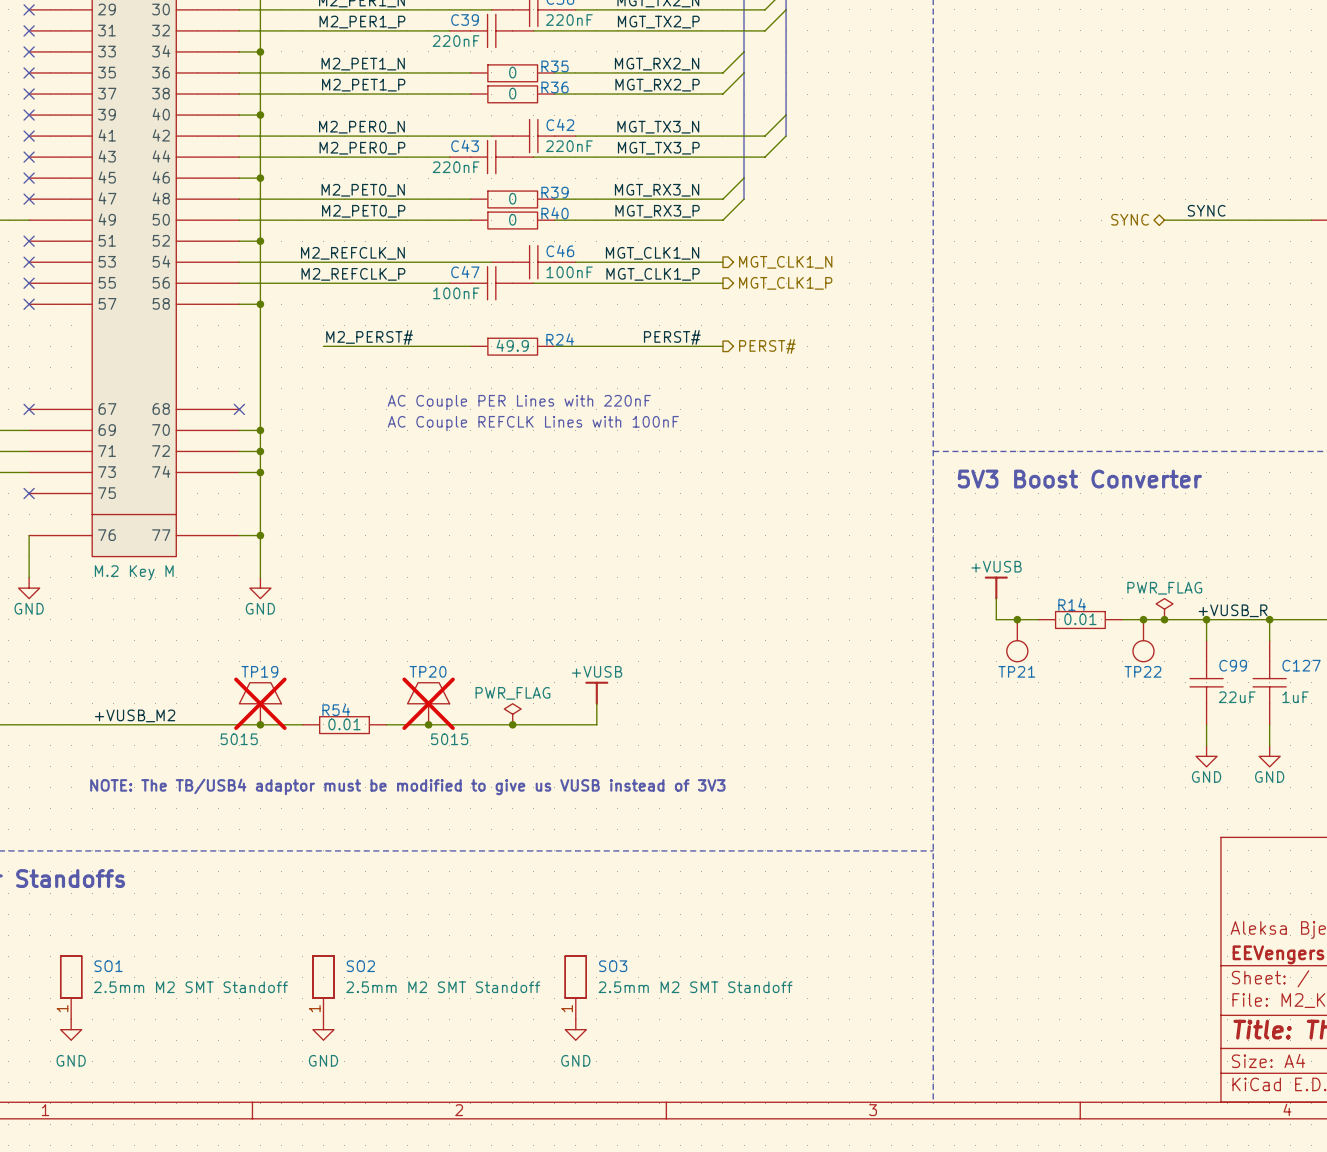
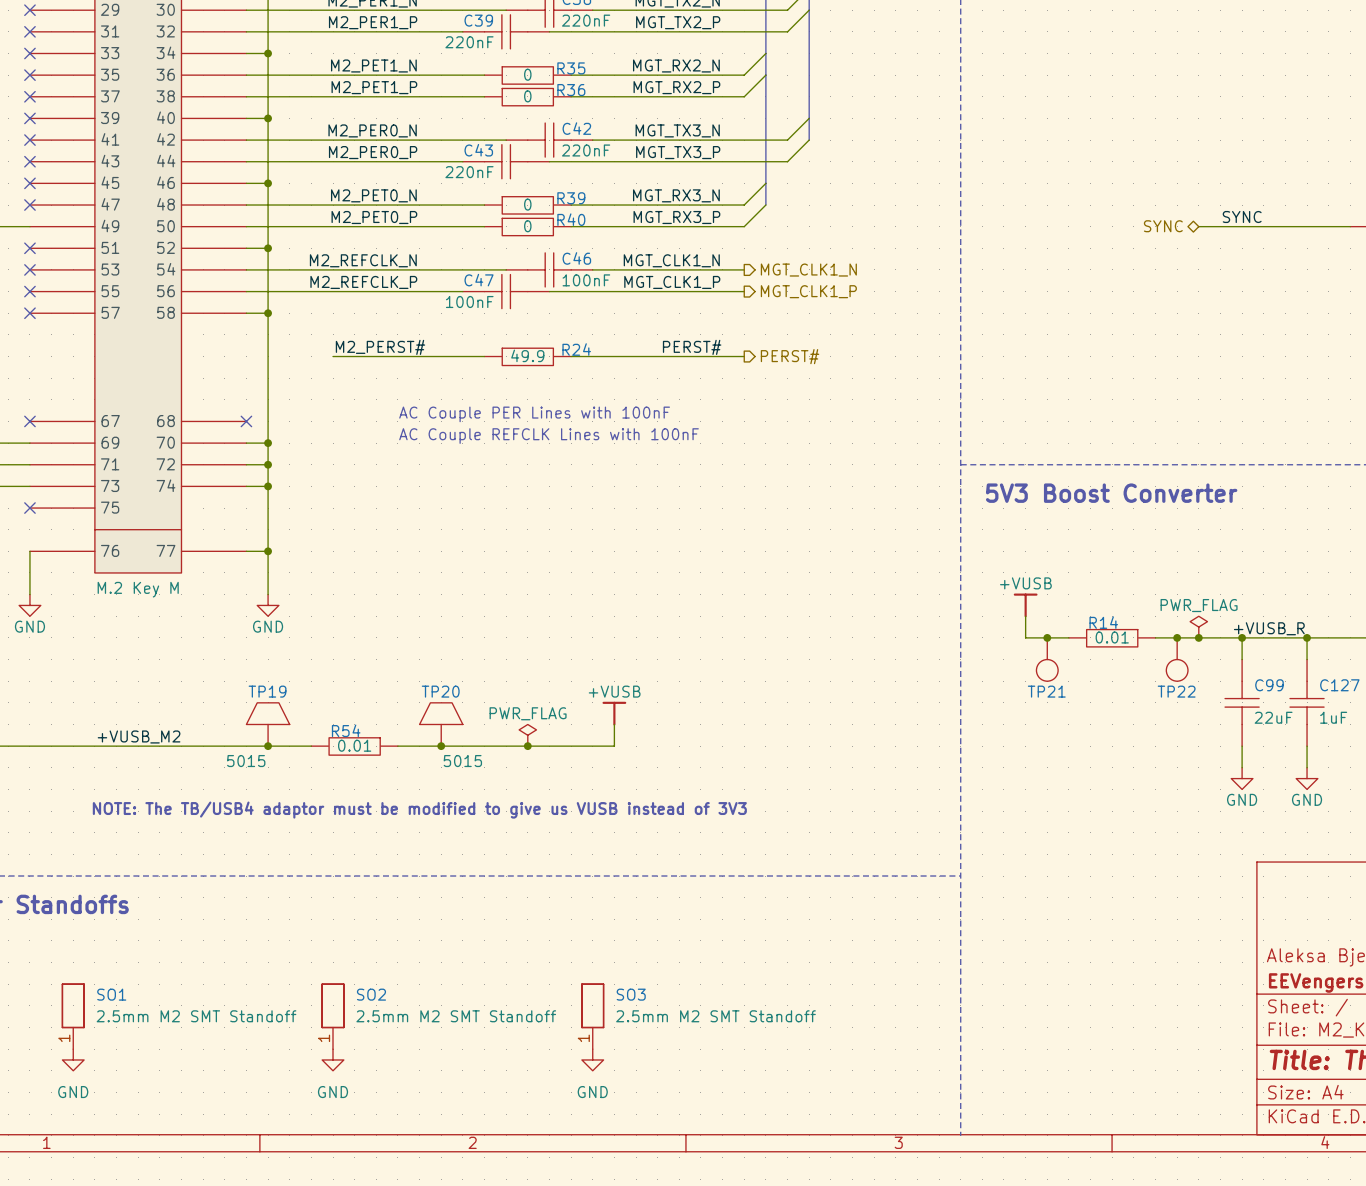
text: AC Couple PER Lines with 220nF (519, 402) -> AC Couple PER Lines with 100nF (534, 414)
TP19 do-not-place cross: (260, 703) -> none
TP20 do-not-place cross: (428, 703) -> none

